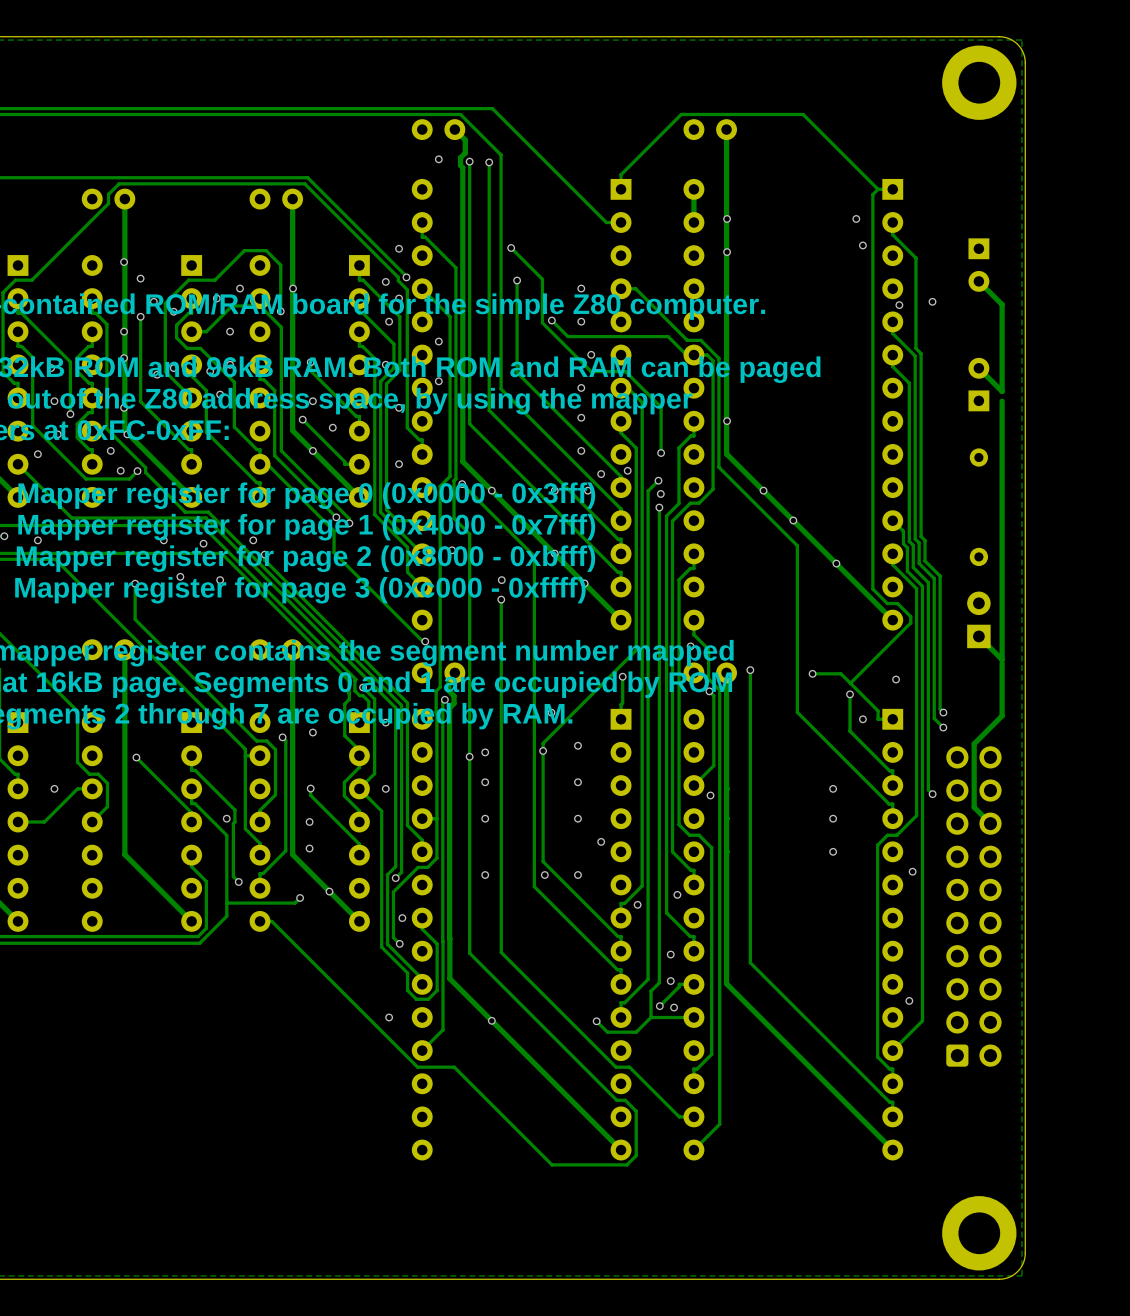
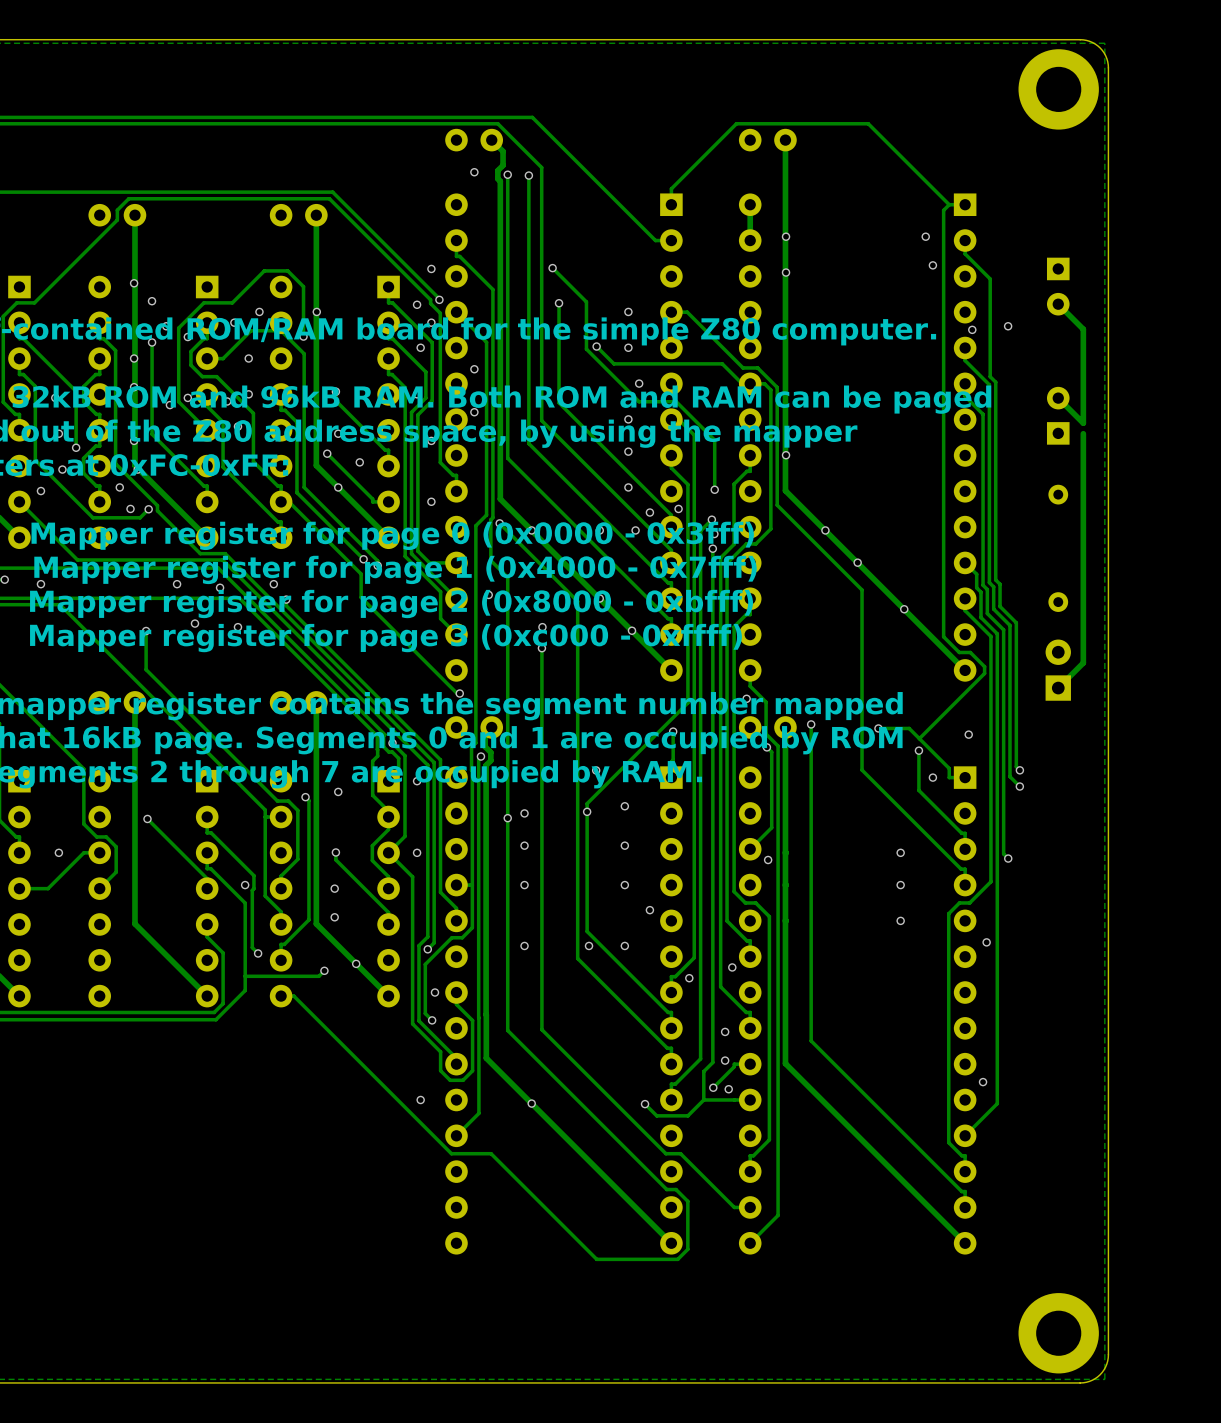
track: (1002, 613) (1002, 659) (978, 636) -> (1083, 662) (1058, 688)
track: (1002, 662) (1002, 715) (974, 743) (974, 807) (990, 823) -> none
part: (973, 906) -> none

